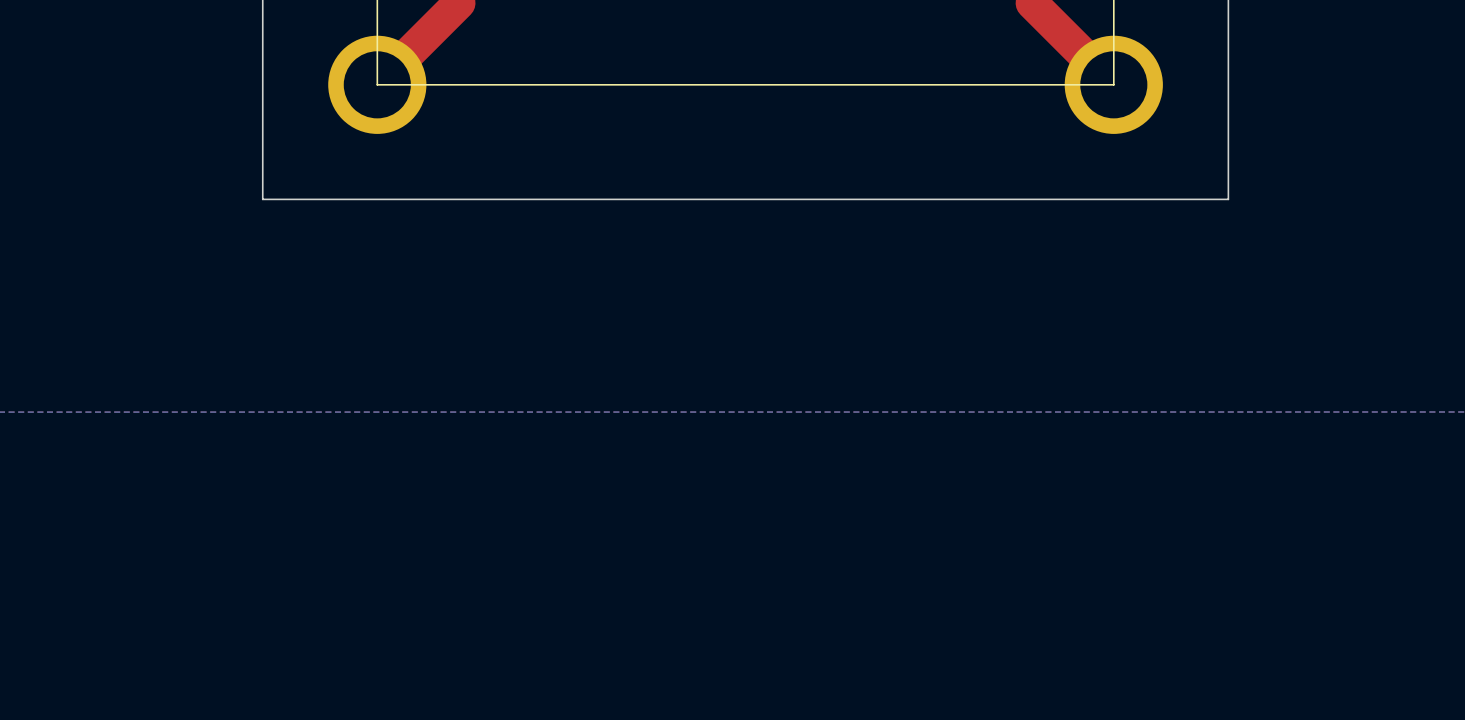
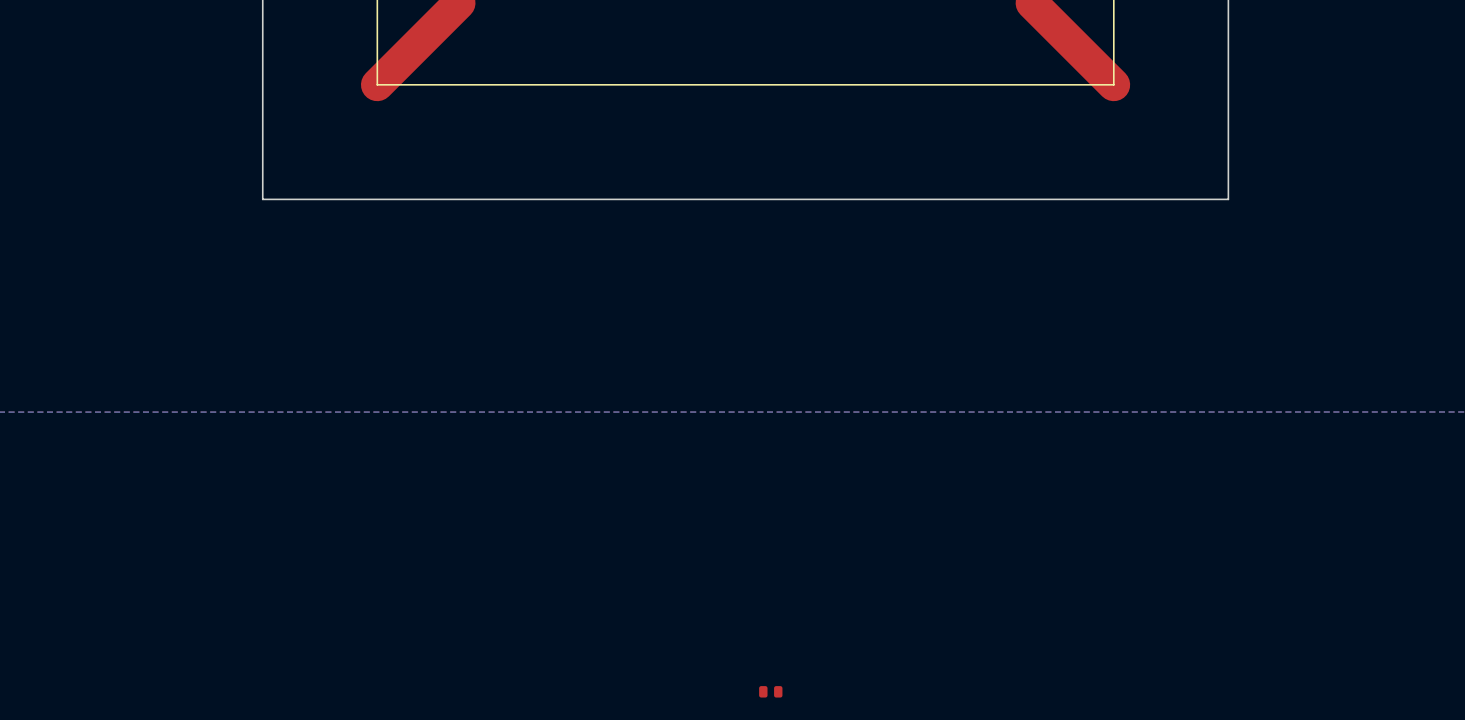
part: (377, 84) -> none
part: (1113, 84) -> none
part: none -> (770, 691)

